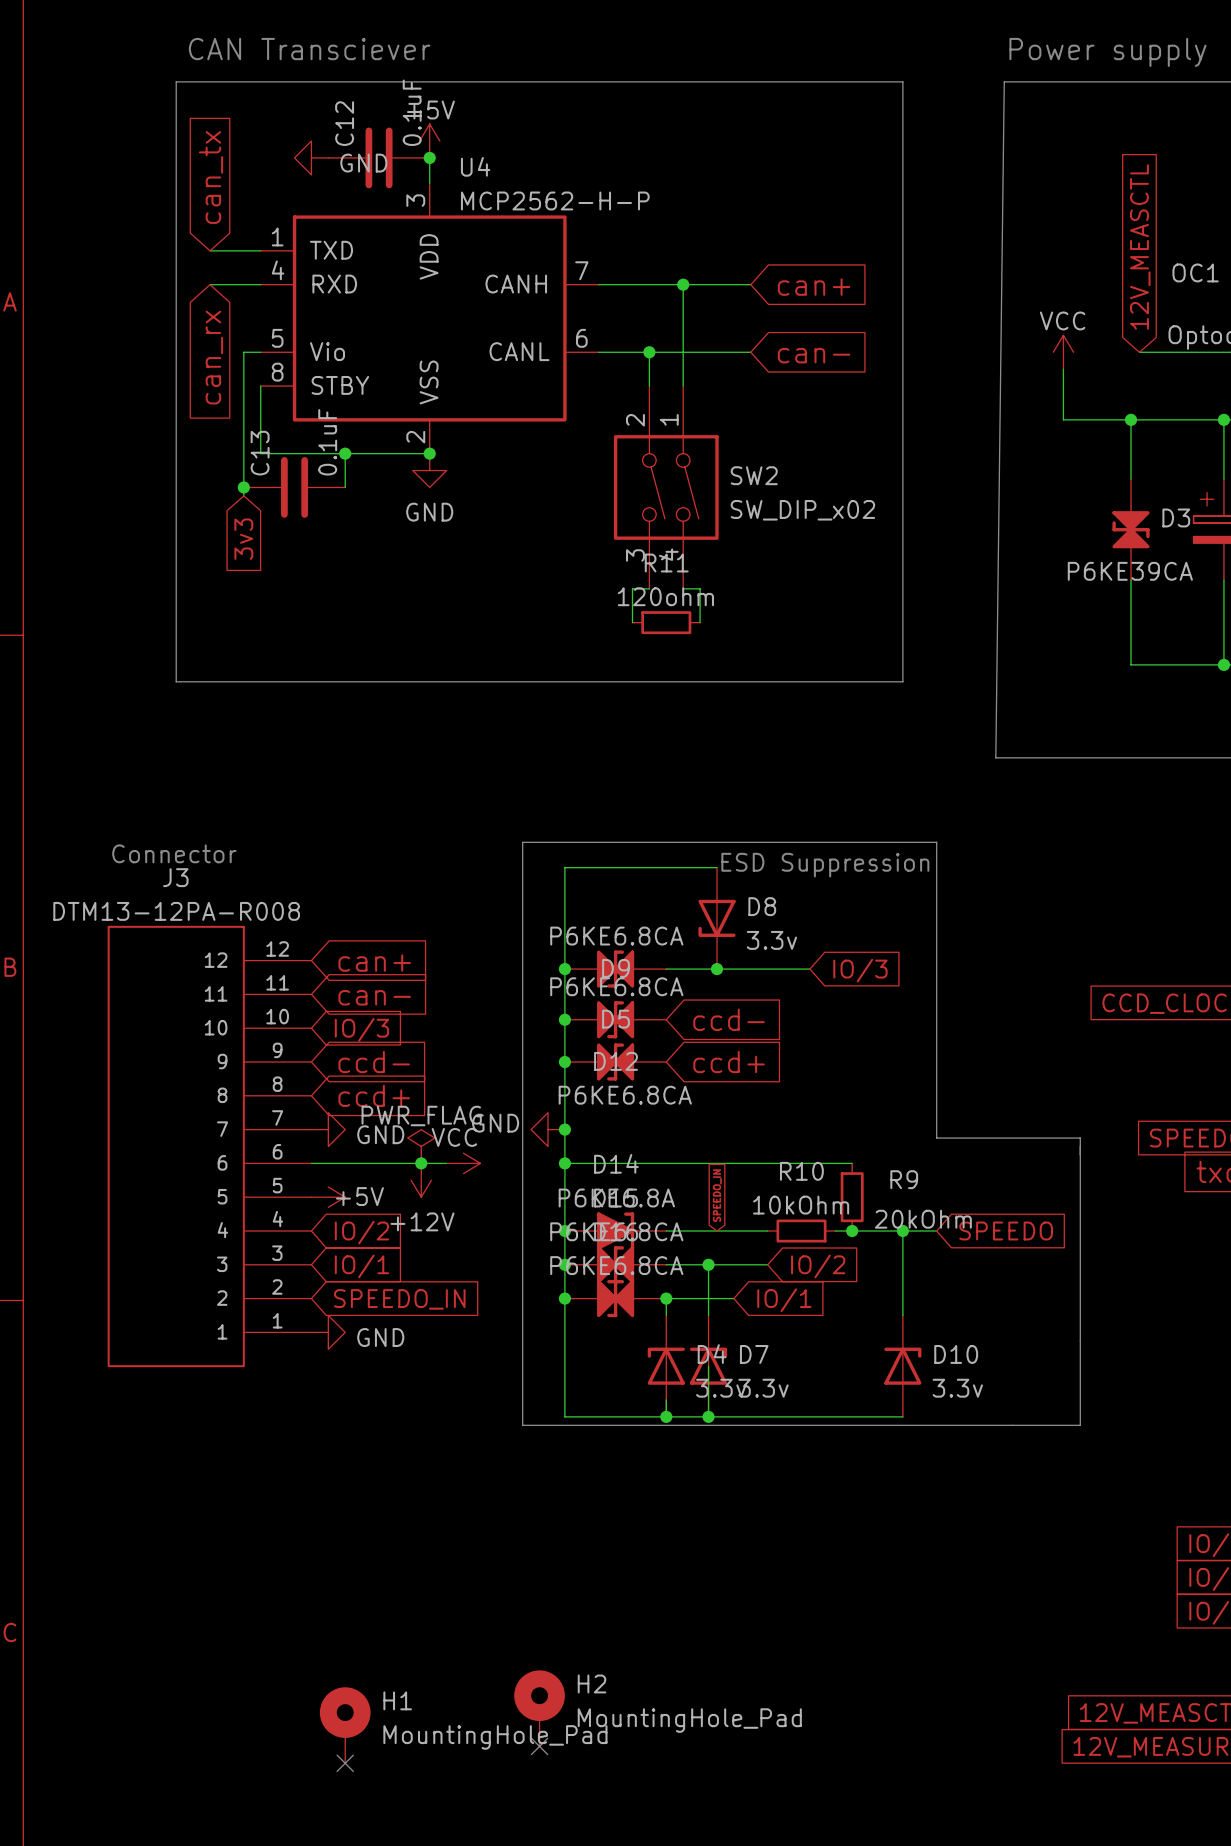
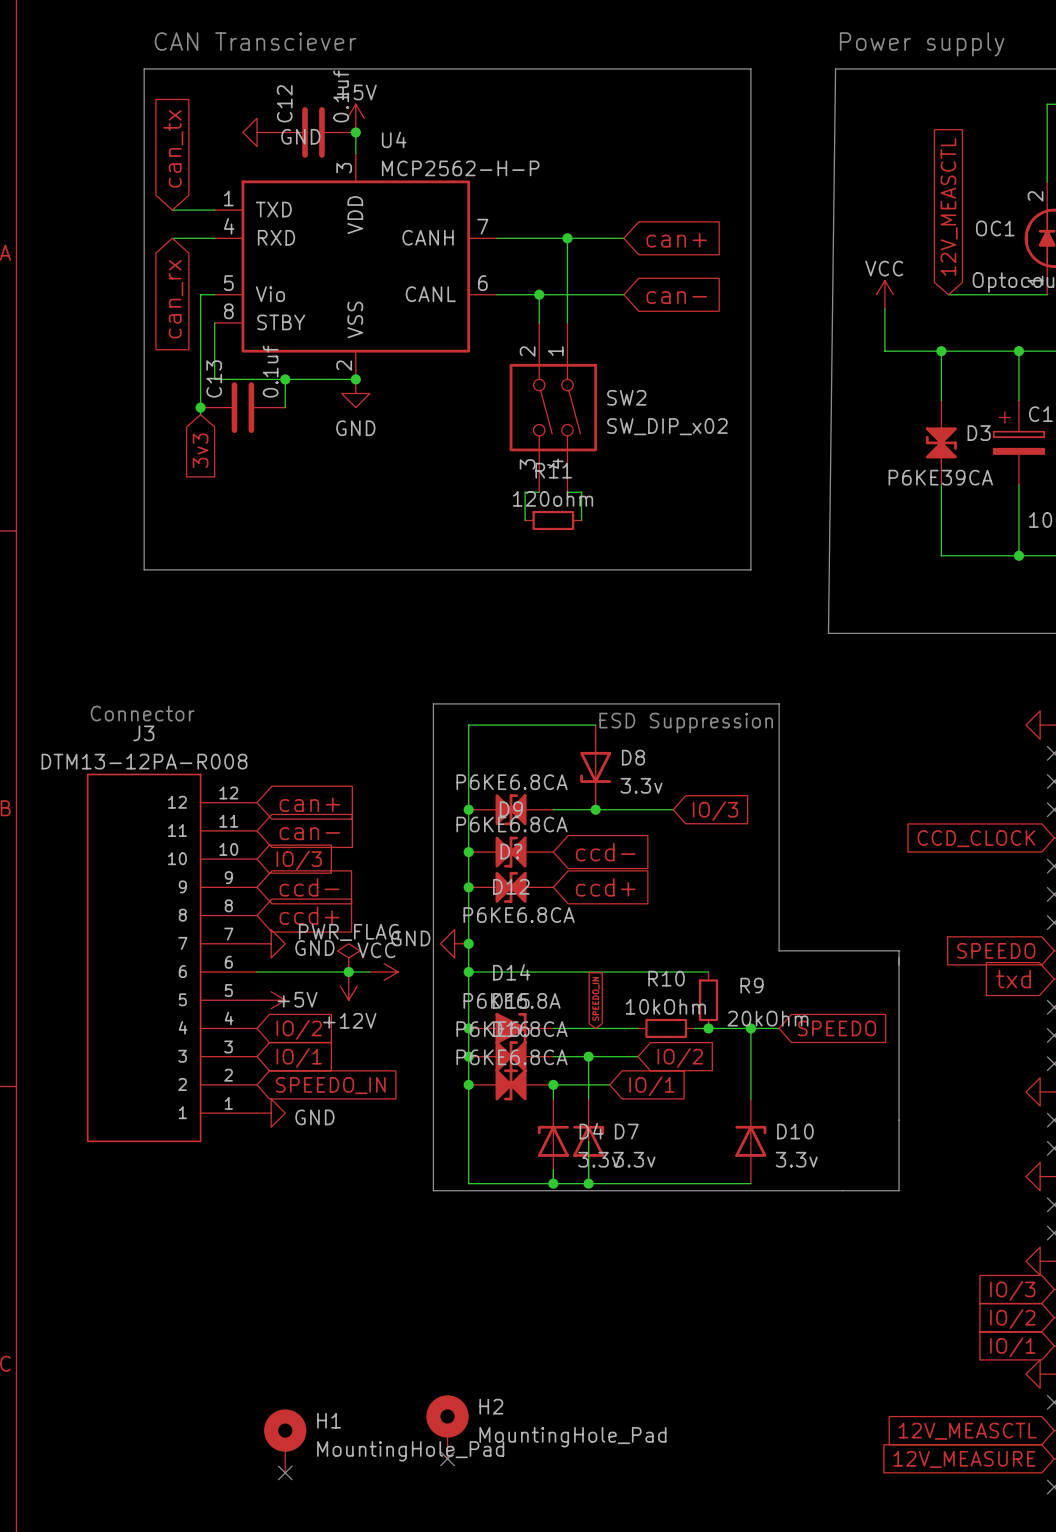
C12 value: 0.1uF (412, 112) -> 0.1uf (341, 96)
C13 value: 0.1uF (327, 442) -> 0.1uf (270, 371)
D5 name: D5 (616, 1019) -> D? (511, 851)

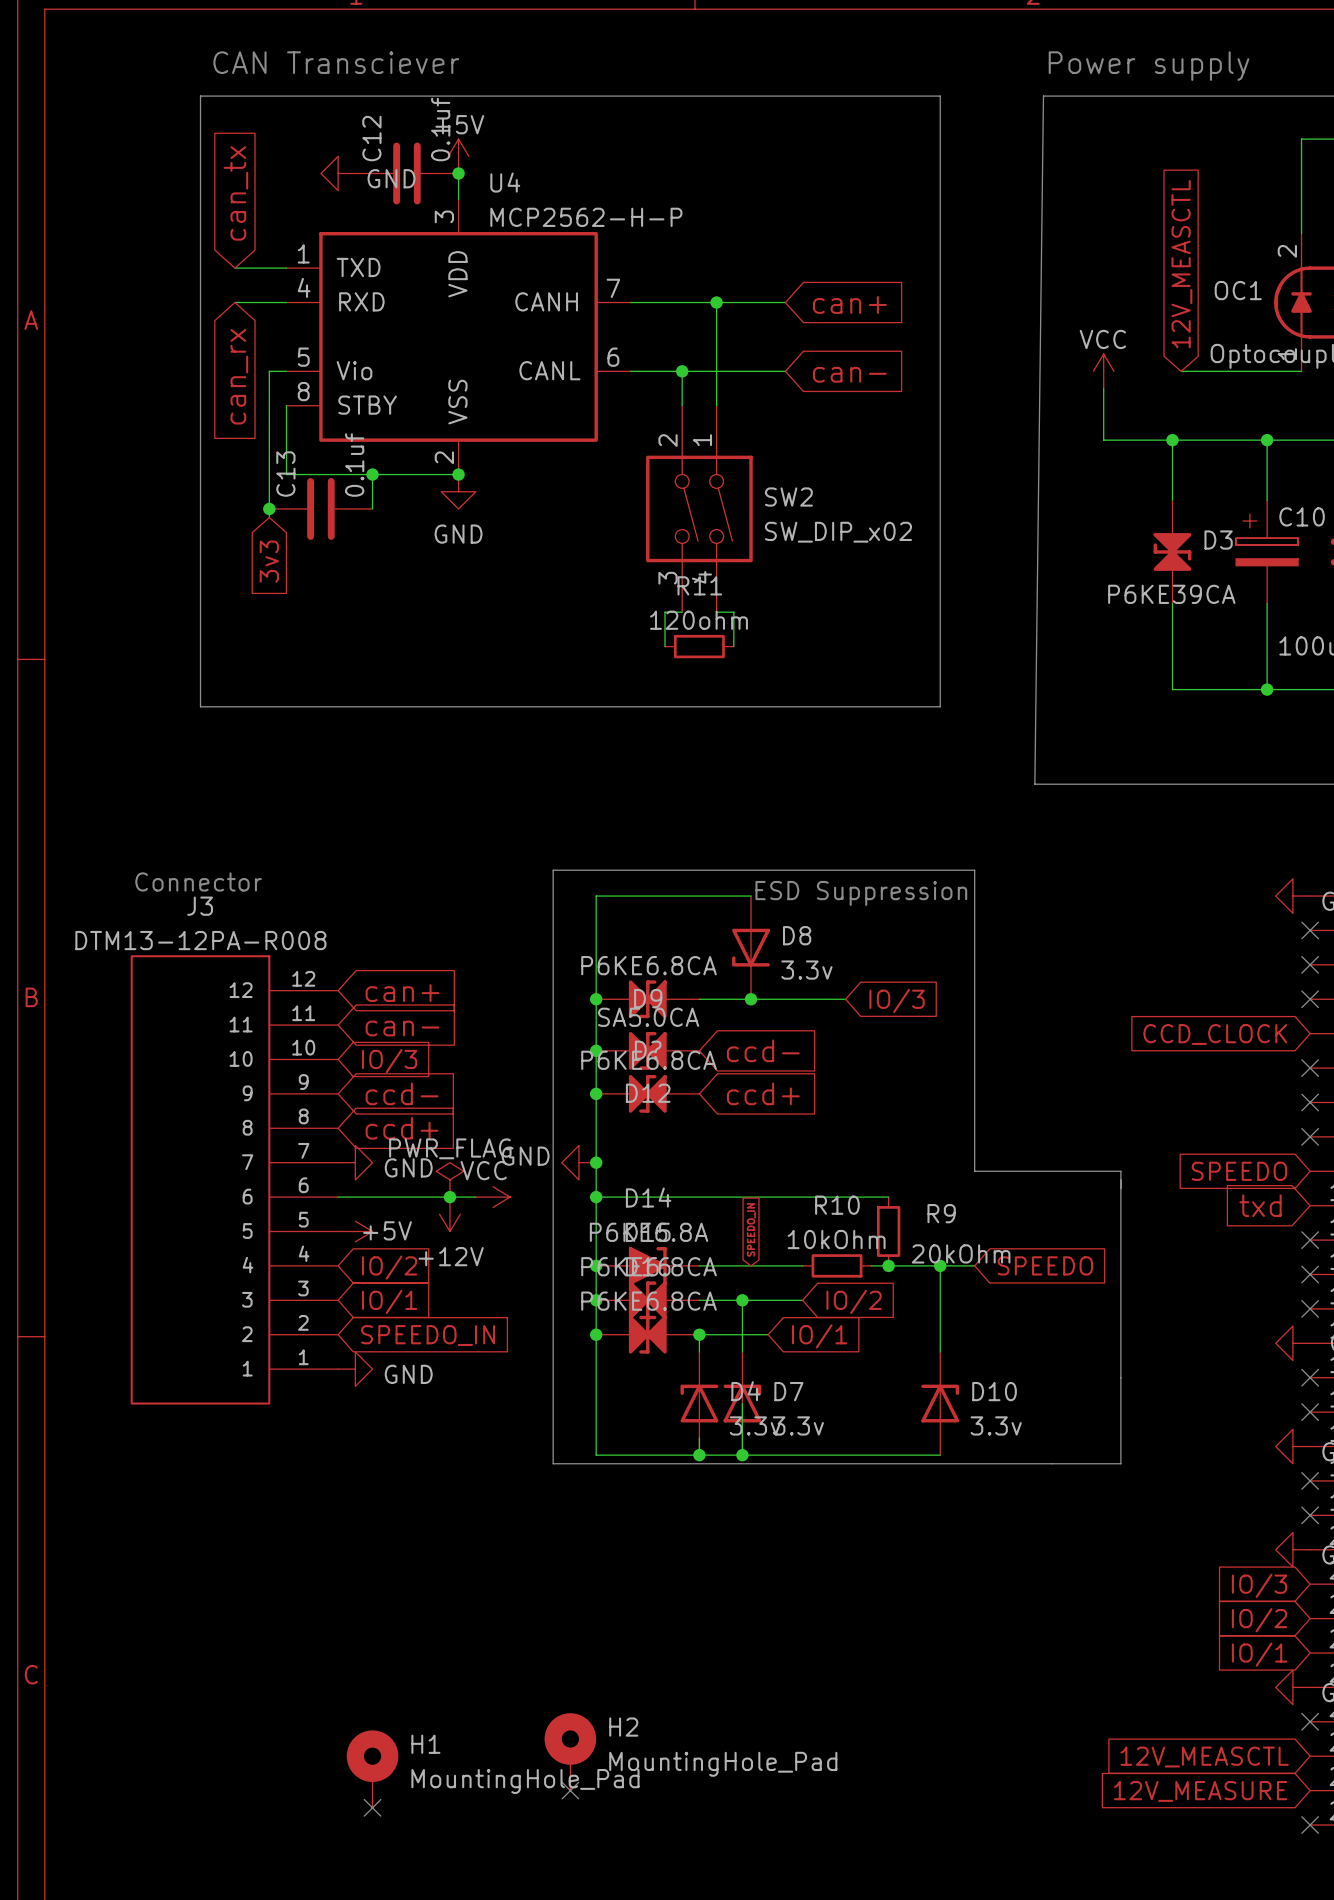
D? value: P6KE6.8CA (512, 824) -> SA5.0CA (648, 1017)
D12 value position: P6KE6.8CA (519, 915) -> P6KE6.8CA (649, 1060)

